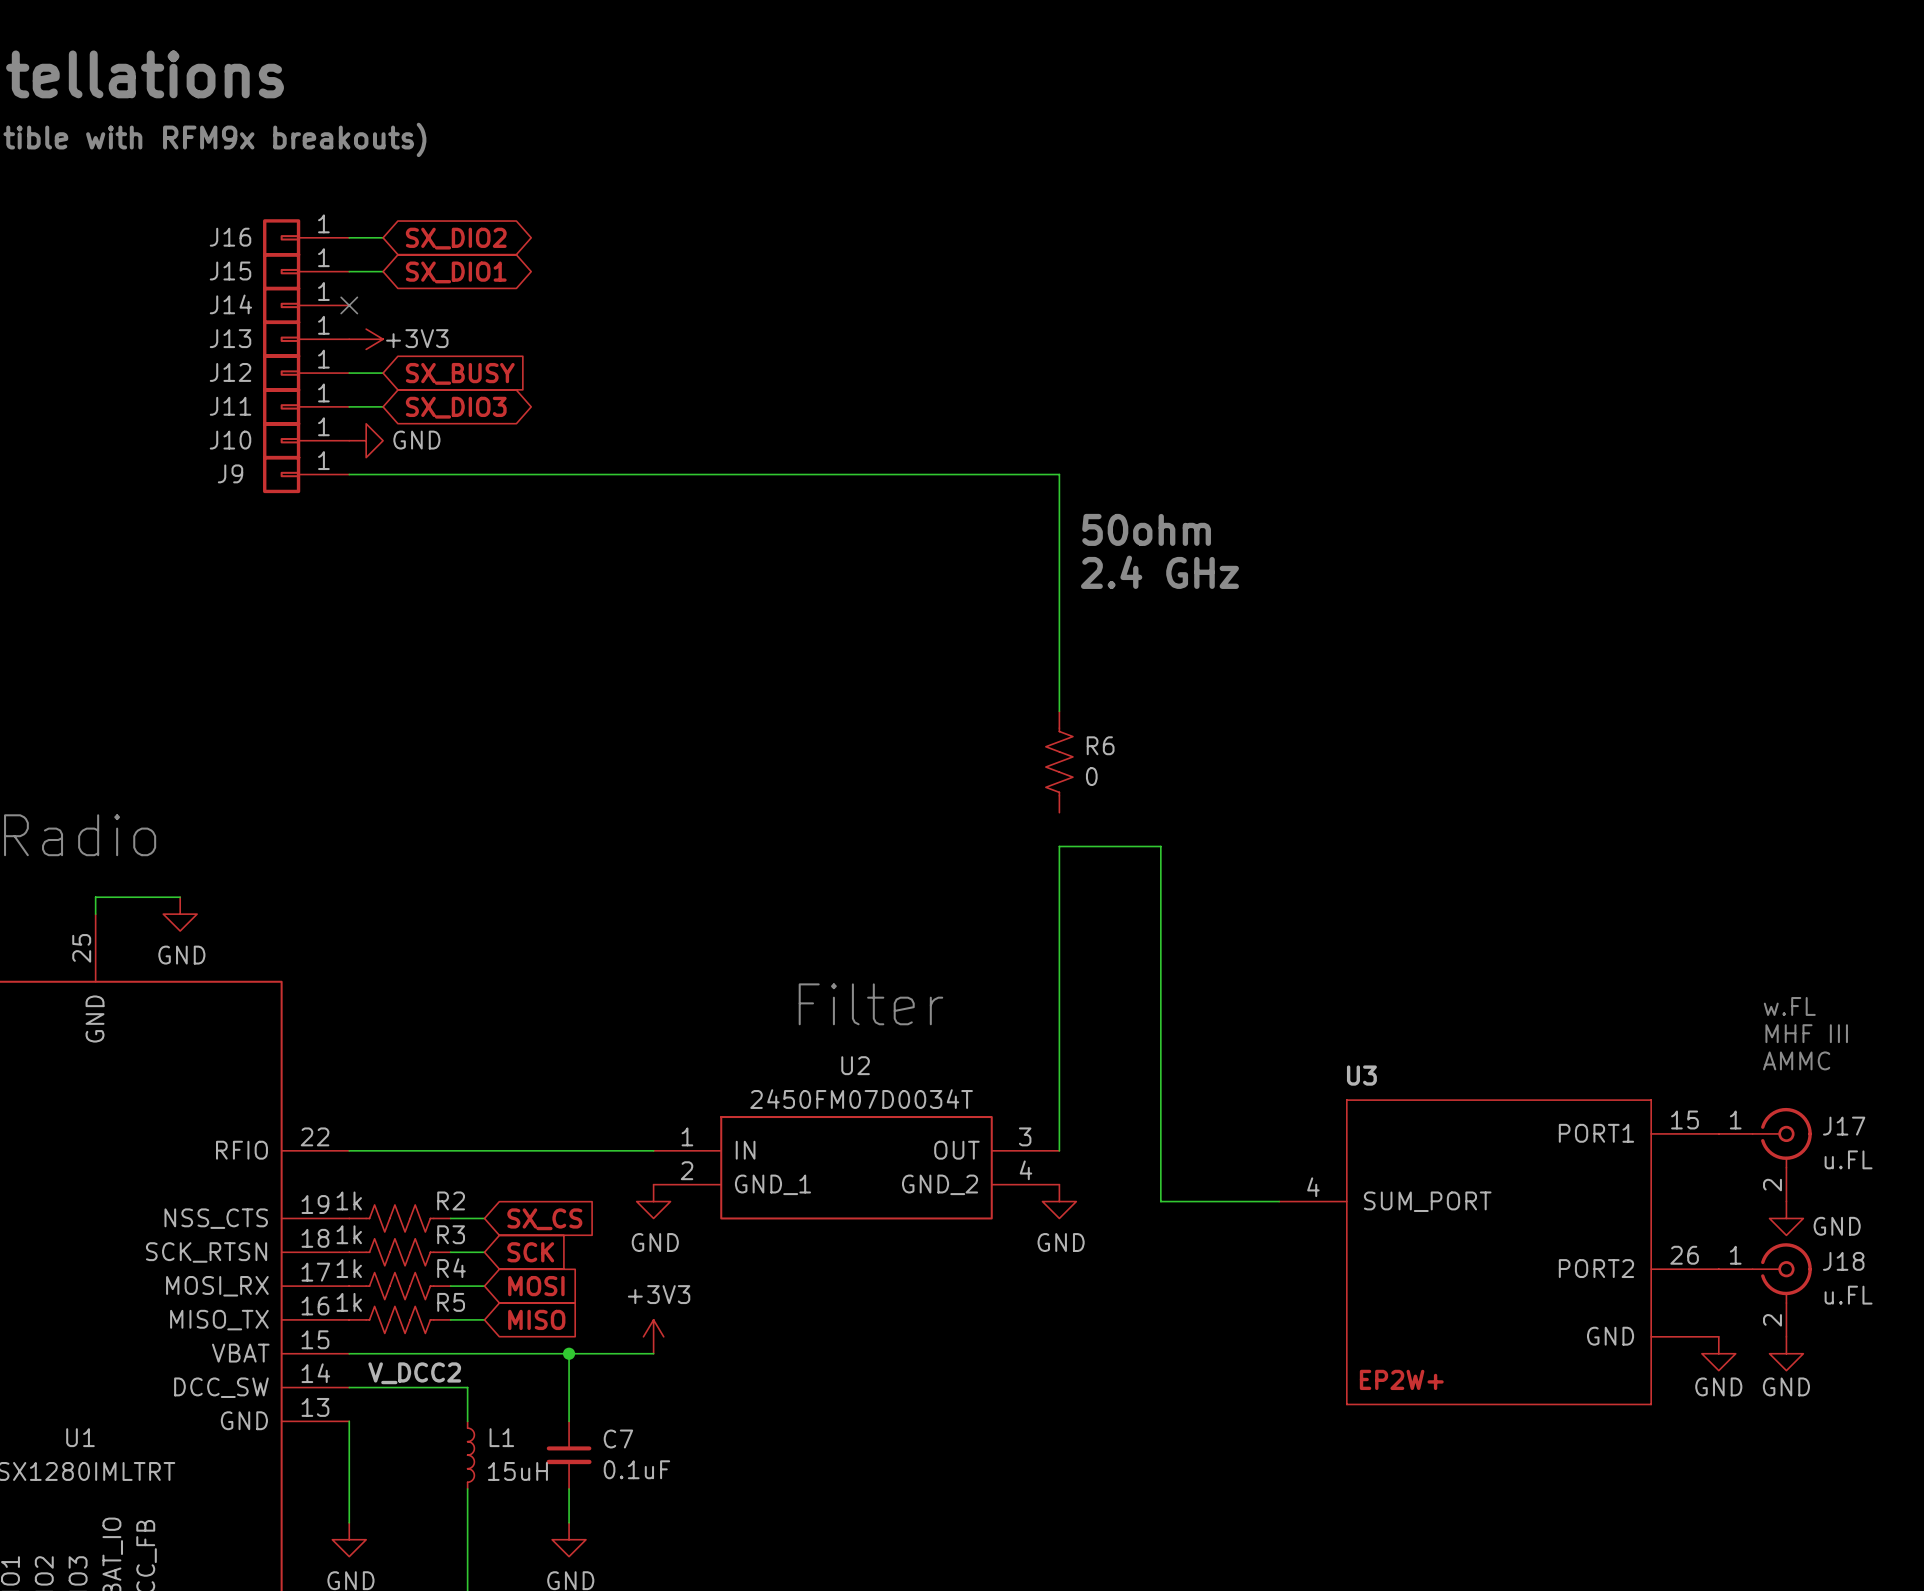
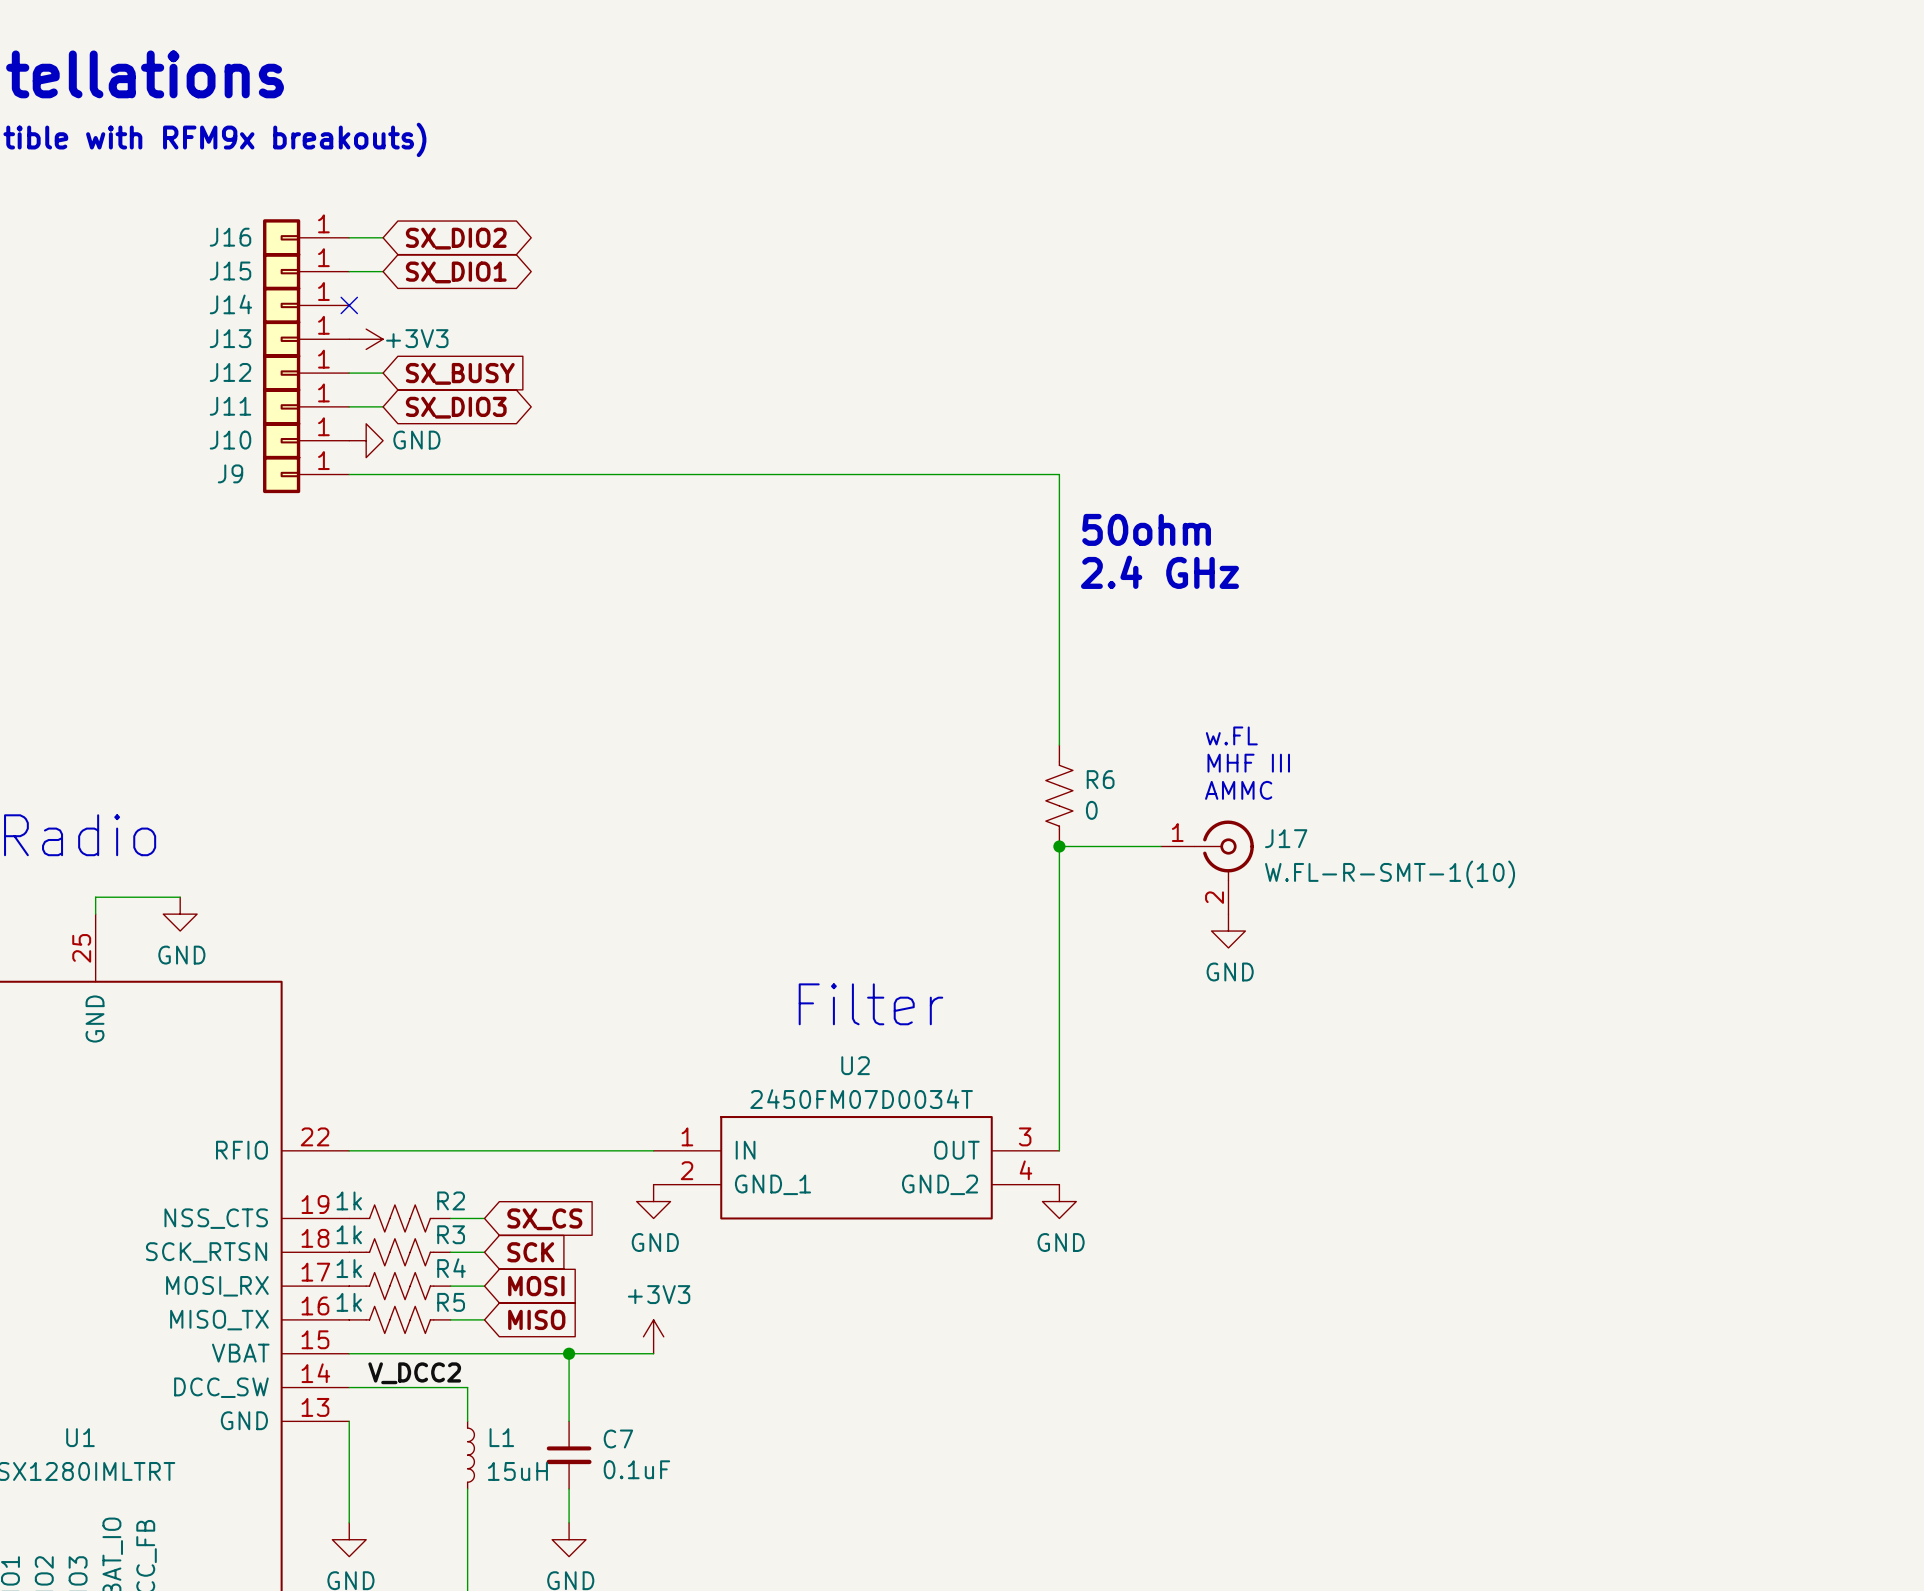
text: none -> w.FL (1231, 735)
R6 position: (1059, 761) -> (1059, 795)
text: none -> MHF III (1248, 763)
text: none -> AMMC (1238, 790)
junction: none -> (1059, 846)
wire: (1160, 846) (1160, 1201) (1279, 1201) -> none
power symbol: none -> GND (1228, 931)
text: w.FL (1789, 1006) -> none
text: MHF III (1806, 1033) -> none
text: AMMC (1796, 1060) -> none
J17 position: (1765, 1154) -> (1207, 867)
J17 value: u.FL (1848, 1159) -> W.FL-R-SMT-1(10) (1390, 874)
power symbol: GND (1786, 1218) -> none
U3: (1499, 1252) -> none
J18: u.FL (1765, 1290) -> none
power symbol: GND (1718, 1353) -> none
power symbol: GND (1786, 1353) -> none

